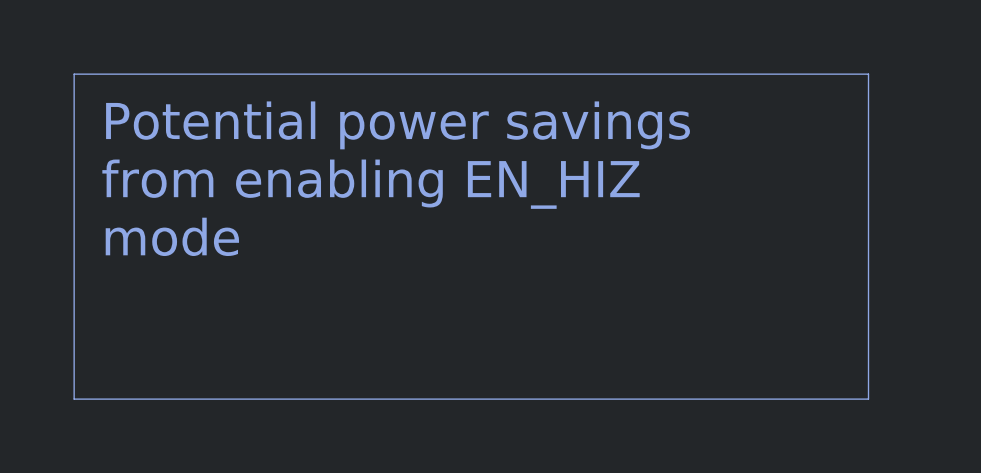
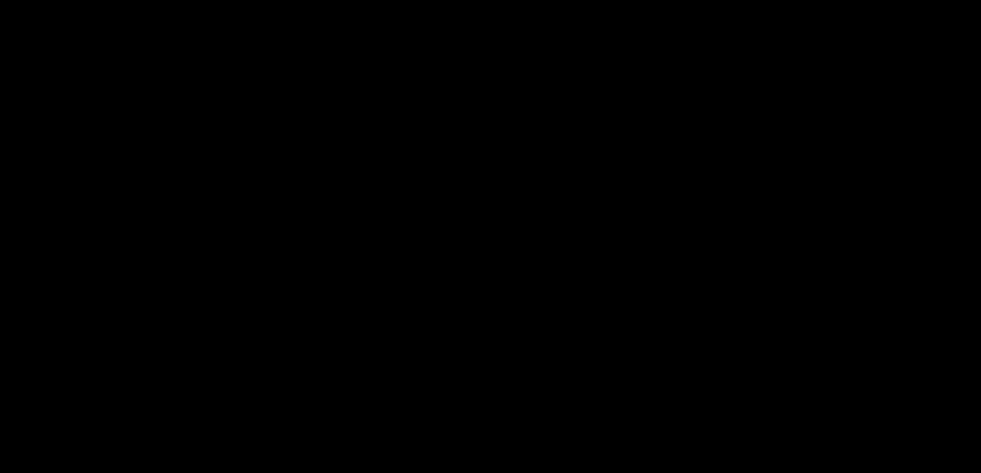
line: (74, 74) (868, 74) (868, 399) (74, 399) (74, 74) -> none
text: Potential power savings (398, 125) -> none
text: from enabling EN_HIZ (371, 184) -> none
text: mode (172, 236) -> none

